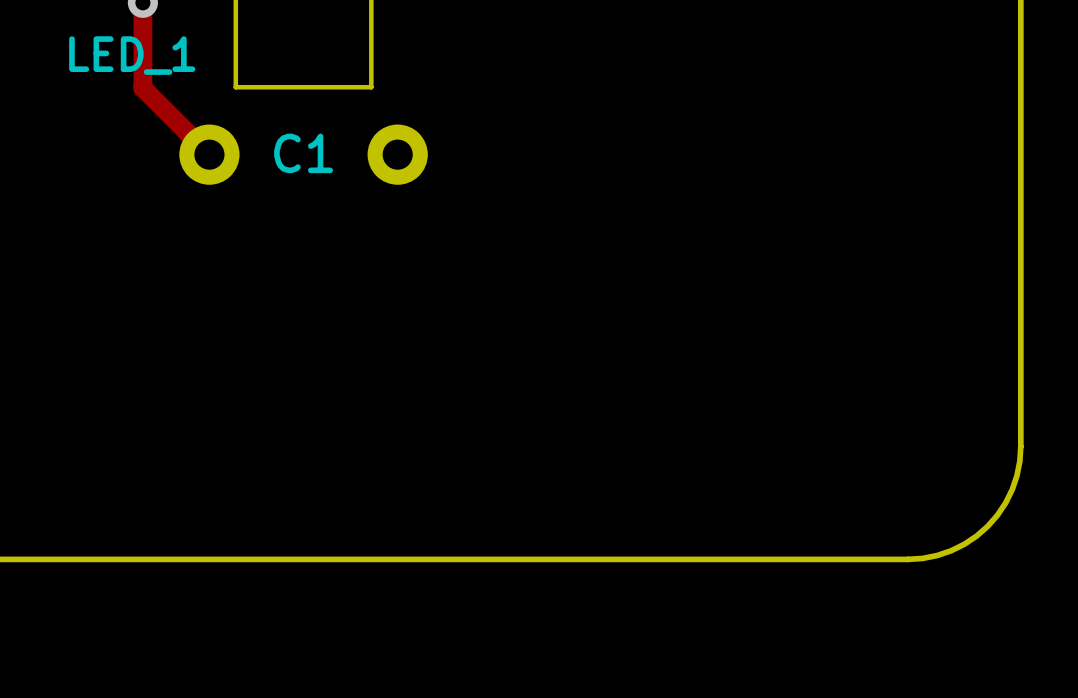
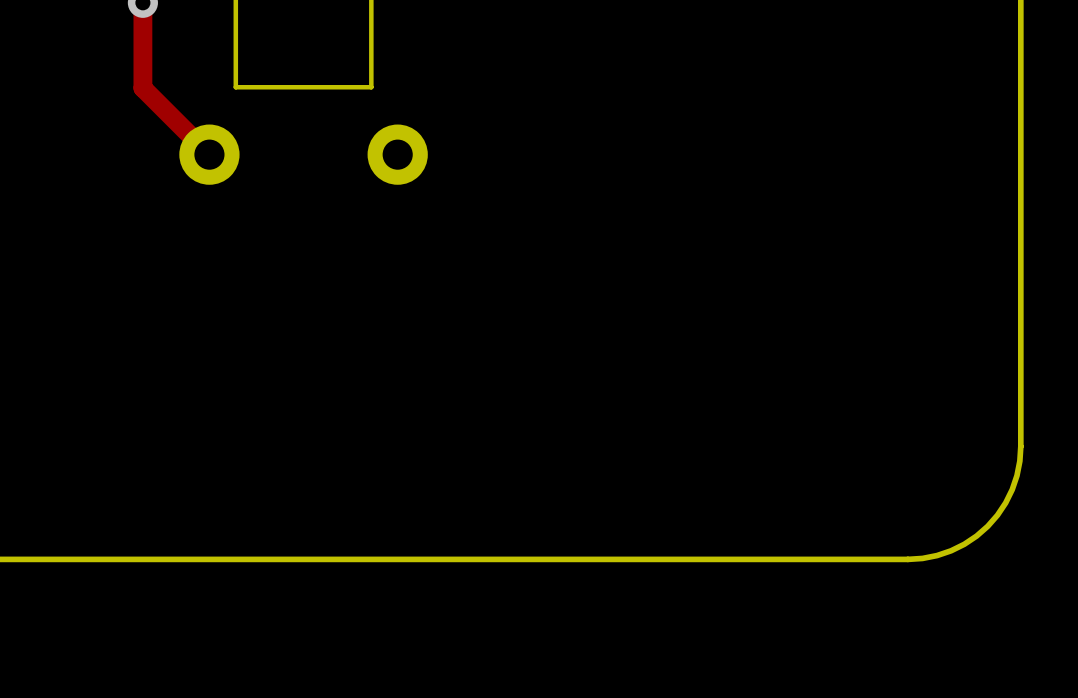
text: LED_1 (132, 55) -> none
text: C1 (303, 153) -> none

